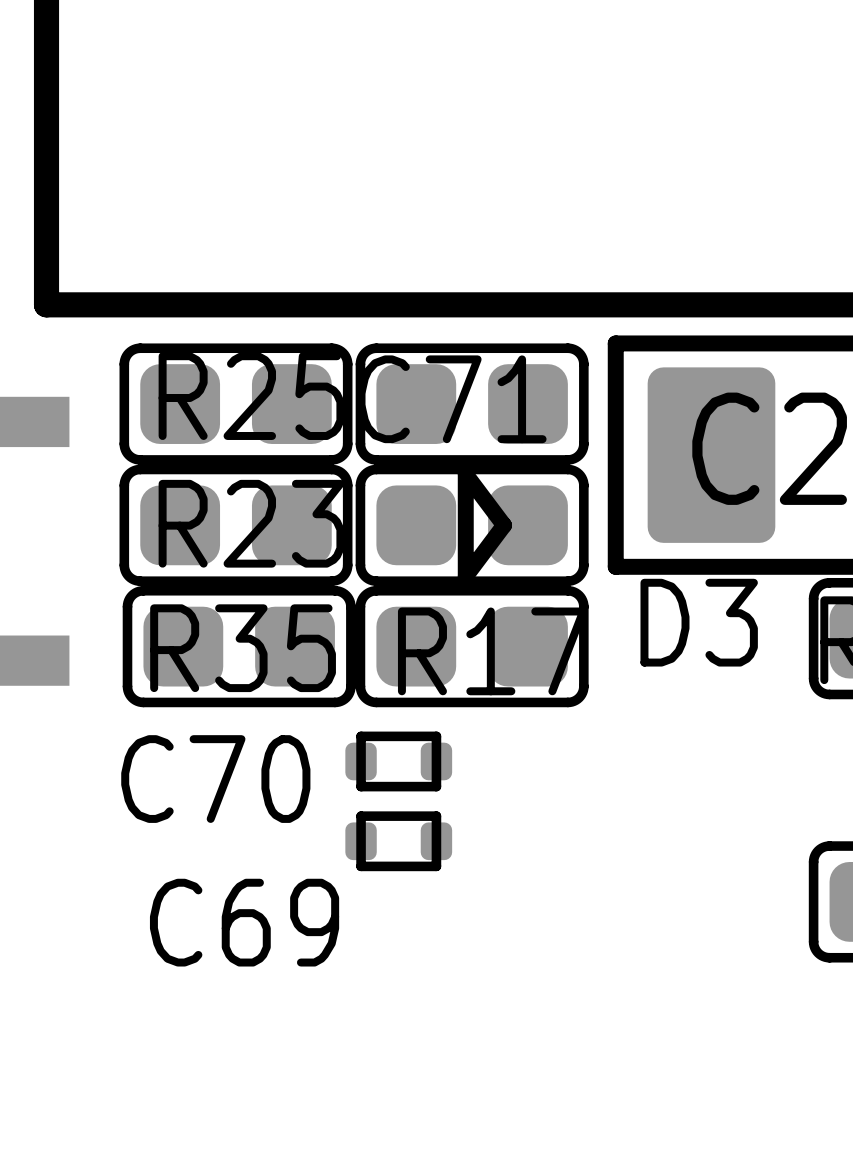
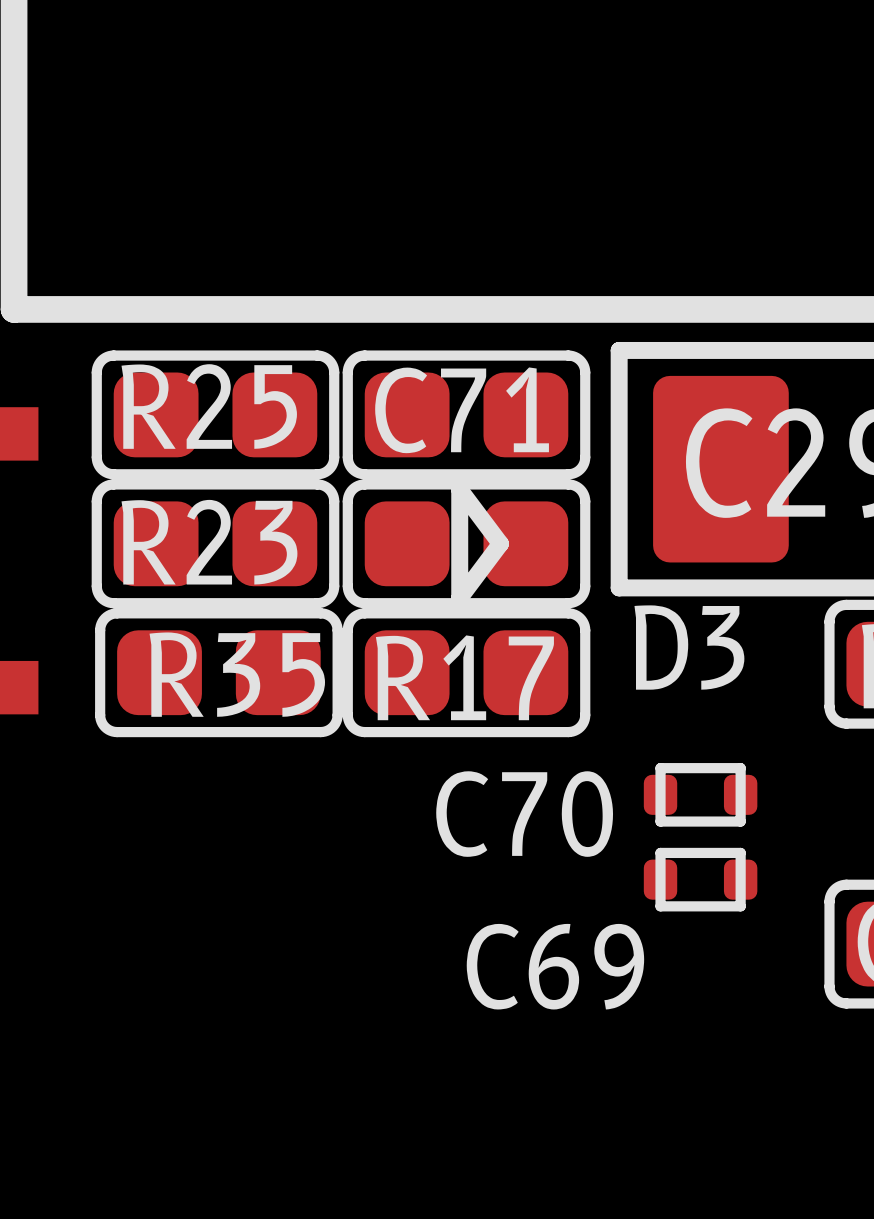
C70 position: (398, 761) -> (700, 794)
C69 position: (398, 841) -> (700, 879)

